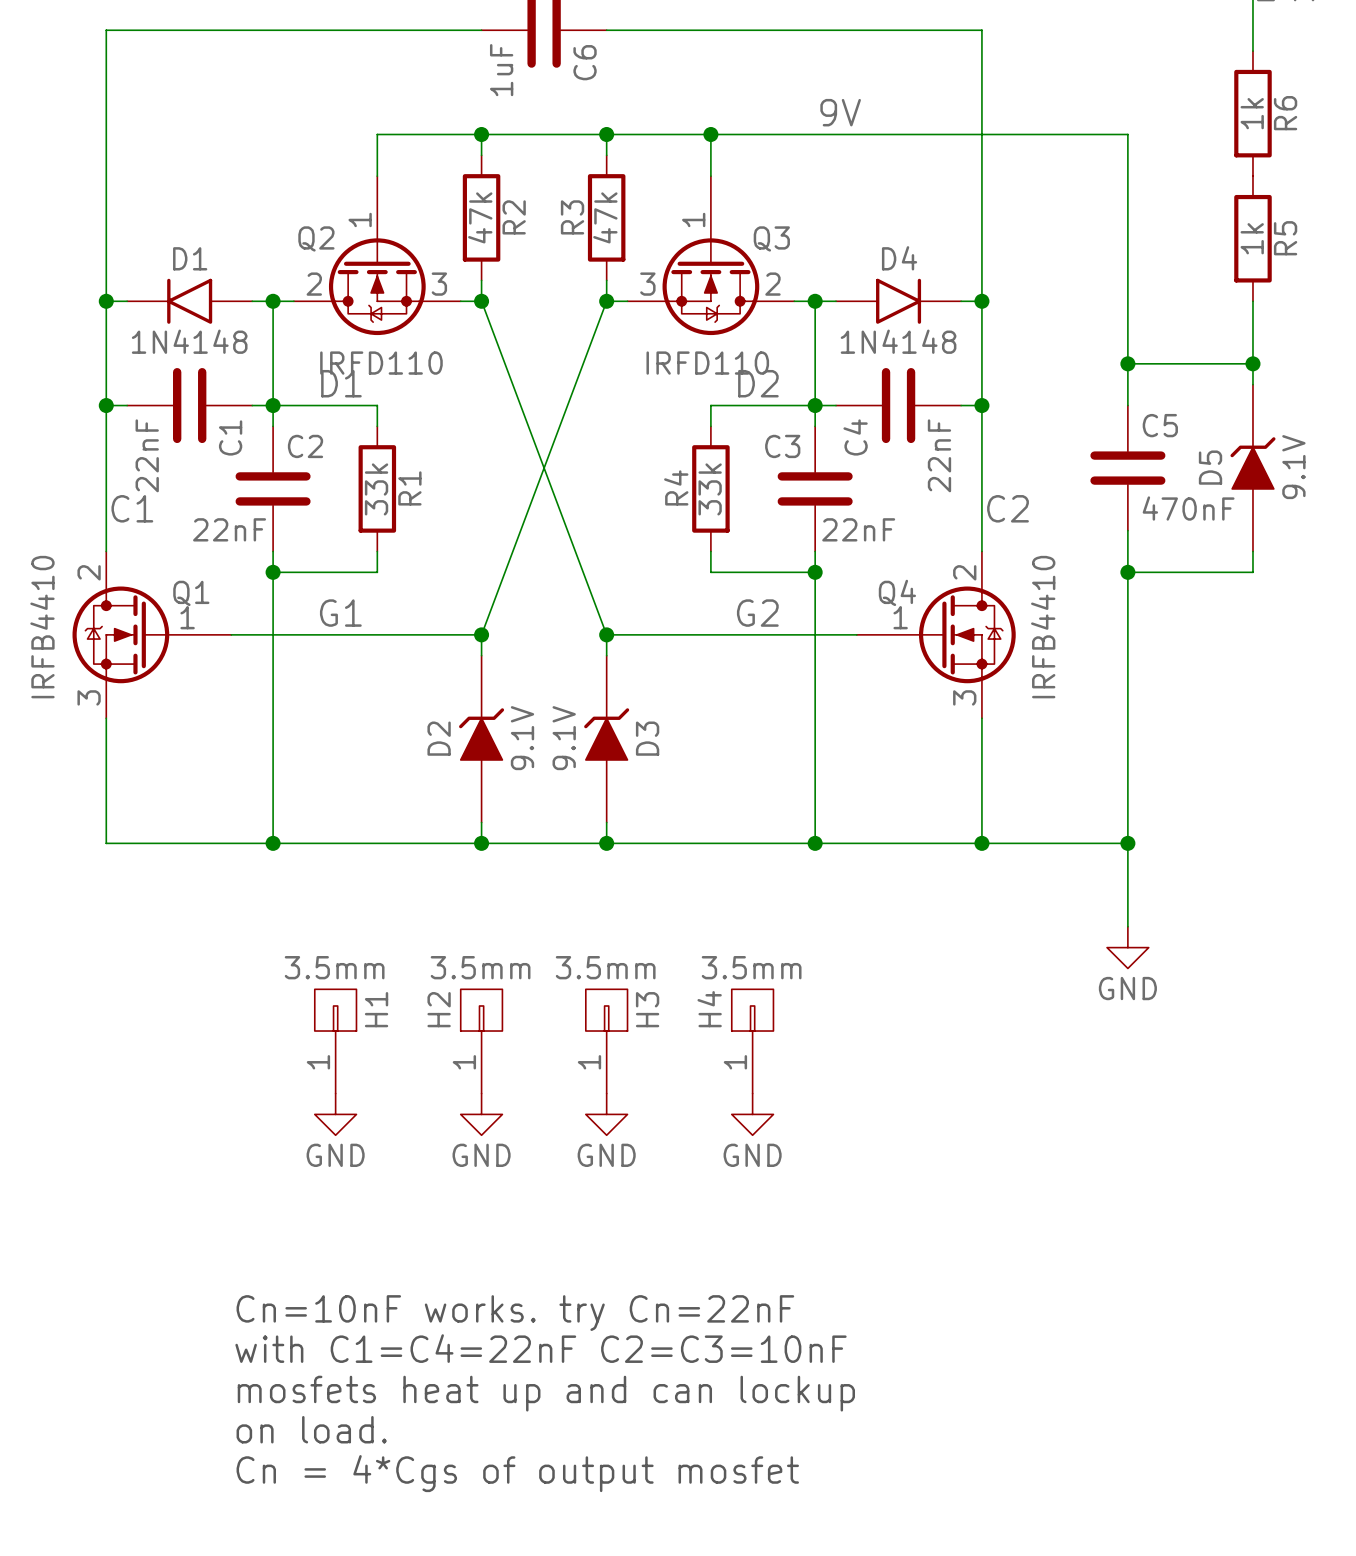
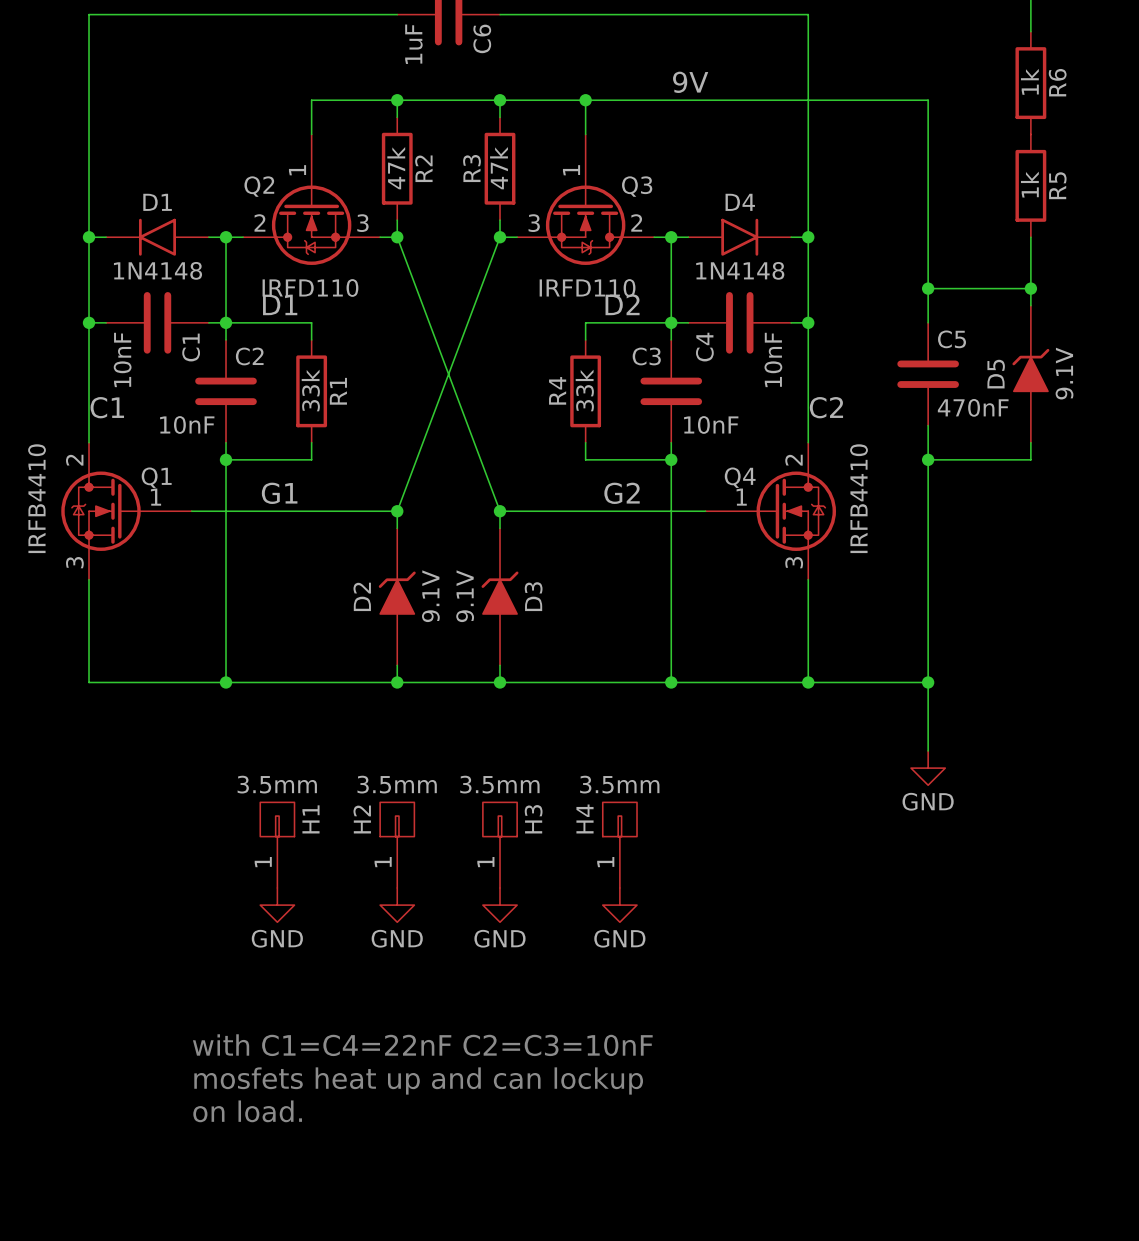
C1 value: 22nF (147, 455) -> 10nF (122, 359)
C4 value: 22nF (939, 455) -> 10nF (773, 359)
C2 value: 22nF (229, 529) -> 10nF (187, 424)
C3 value: 22nF (858, 529) -> 10nF (711, 424)
text: Cn=10nF works. try Cn=22nF (515, 1313) -> none
text position: with C1=C4=22nF C2=C3=10nF (541, 1348) -> with C1=C4=22nF C2=C3=10nF (422, 1045)
text position: mosfets heat up and can lockup (546, 1393) -> mosfets heat up and can lockup (418, 1080)
text position: on load. (311, 1429) -> on load. (247, 1111)
text: Cn = 4*Cgs of output mosfet (517, 1473) -> none

